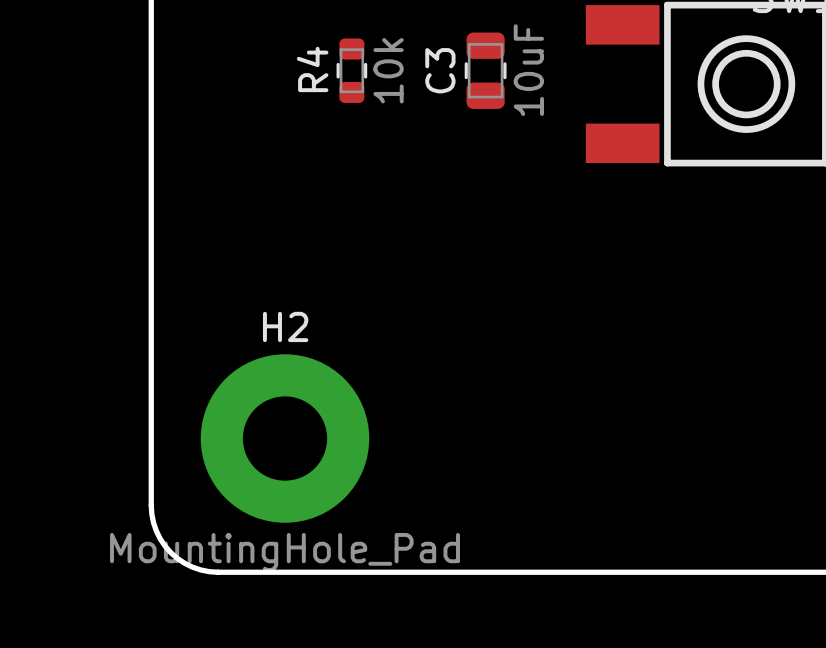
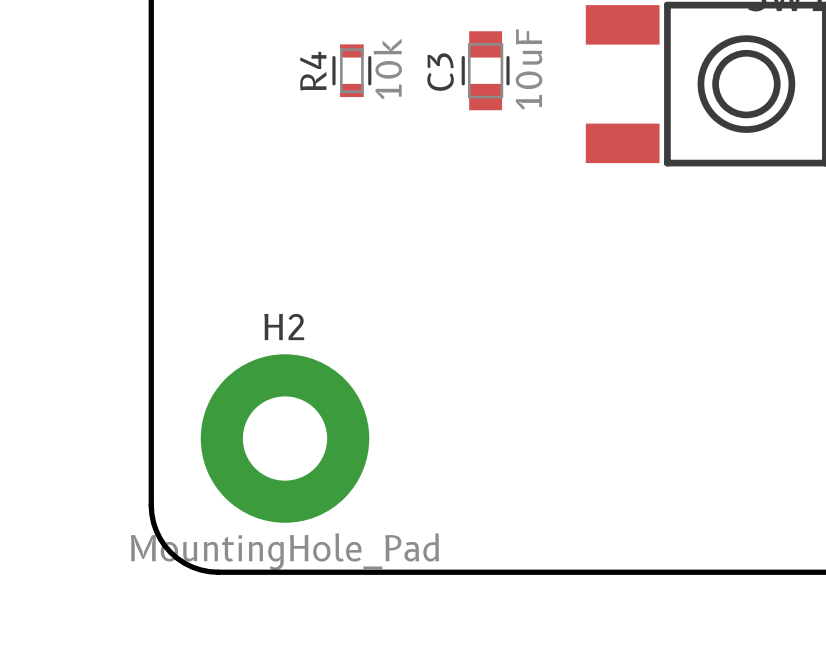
C3 footprint: [464, 32, 507, 109] -> [461, 31, 510, 111]
R4 footprint: [336, 38, 368, 103] -> [332, 44, 372, 98]

